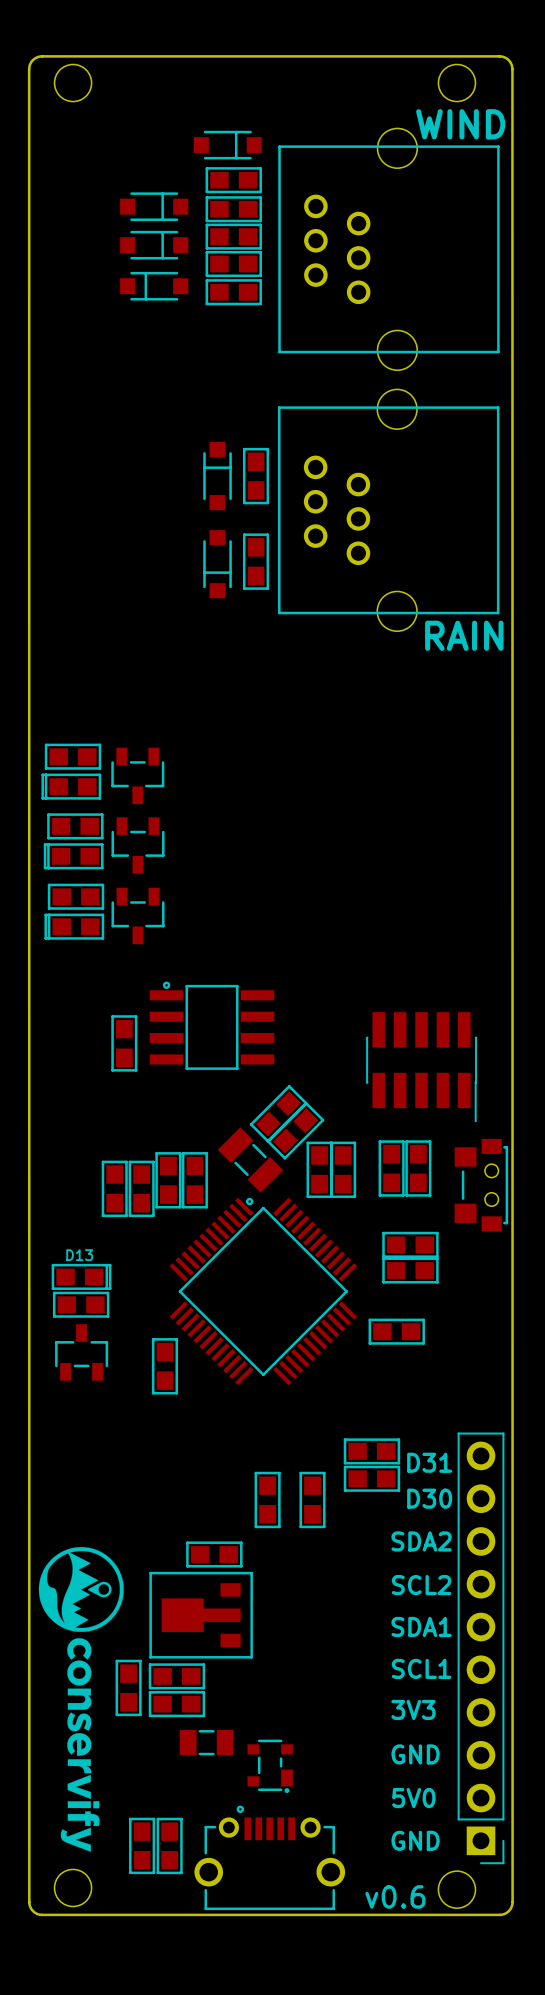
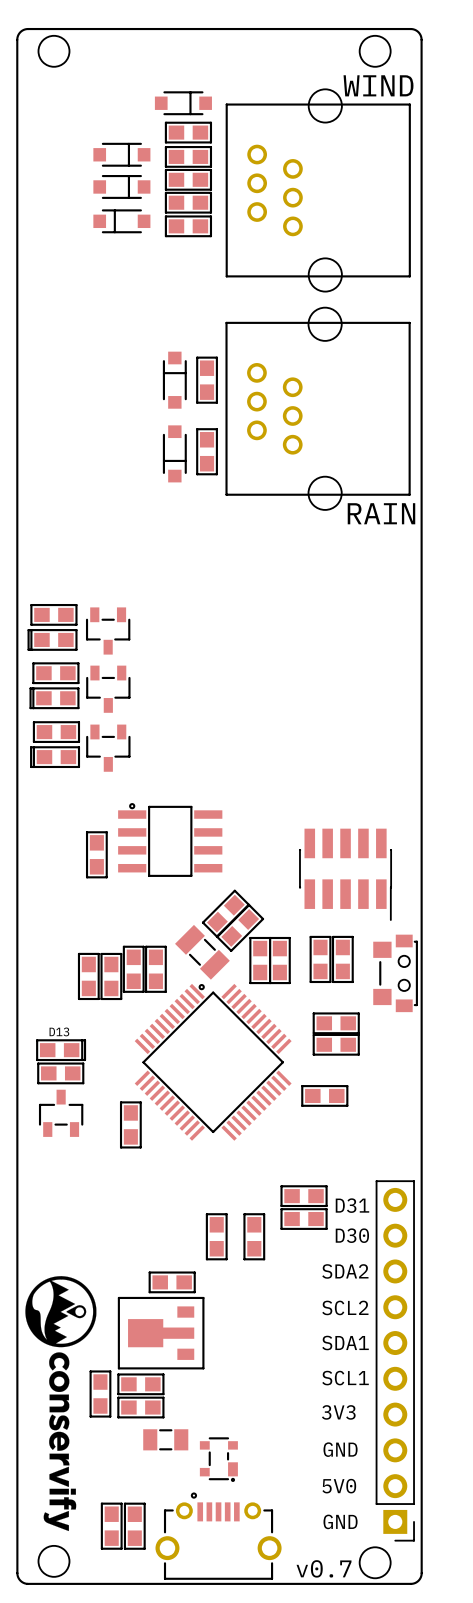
text: v0.6 (395, 1896) -> v0.7 (324, 1568)

